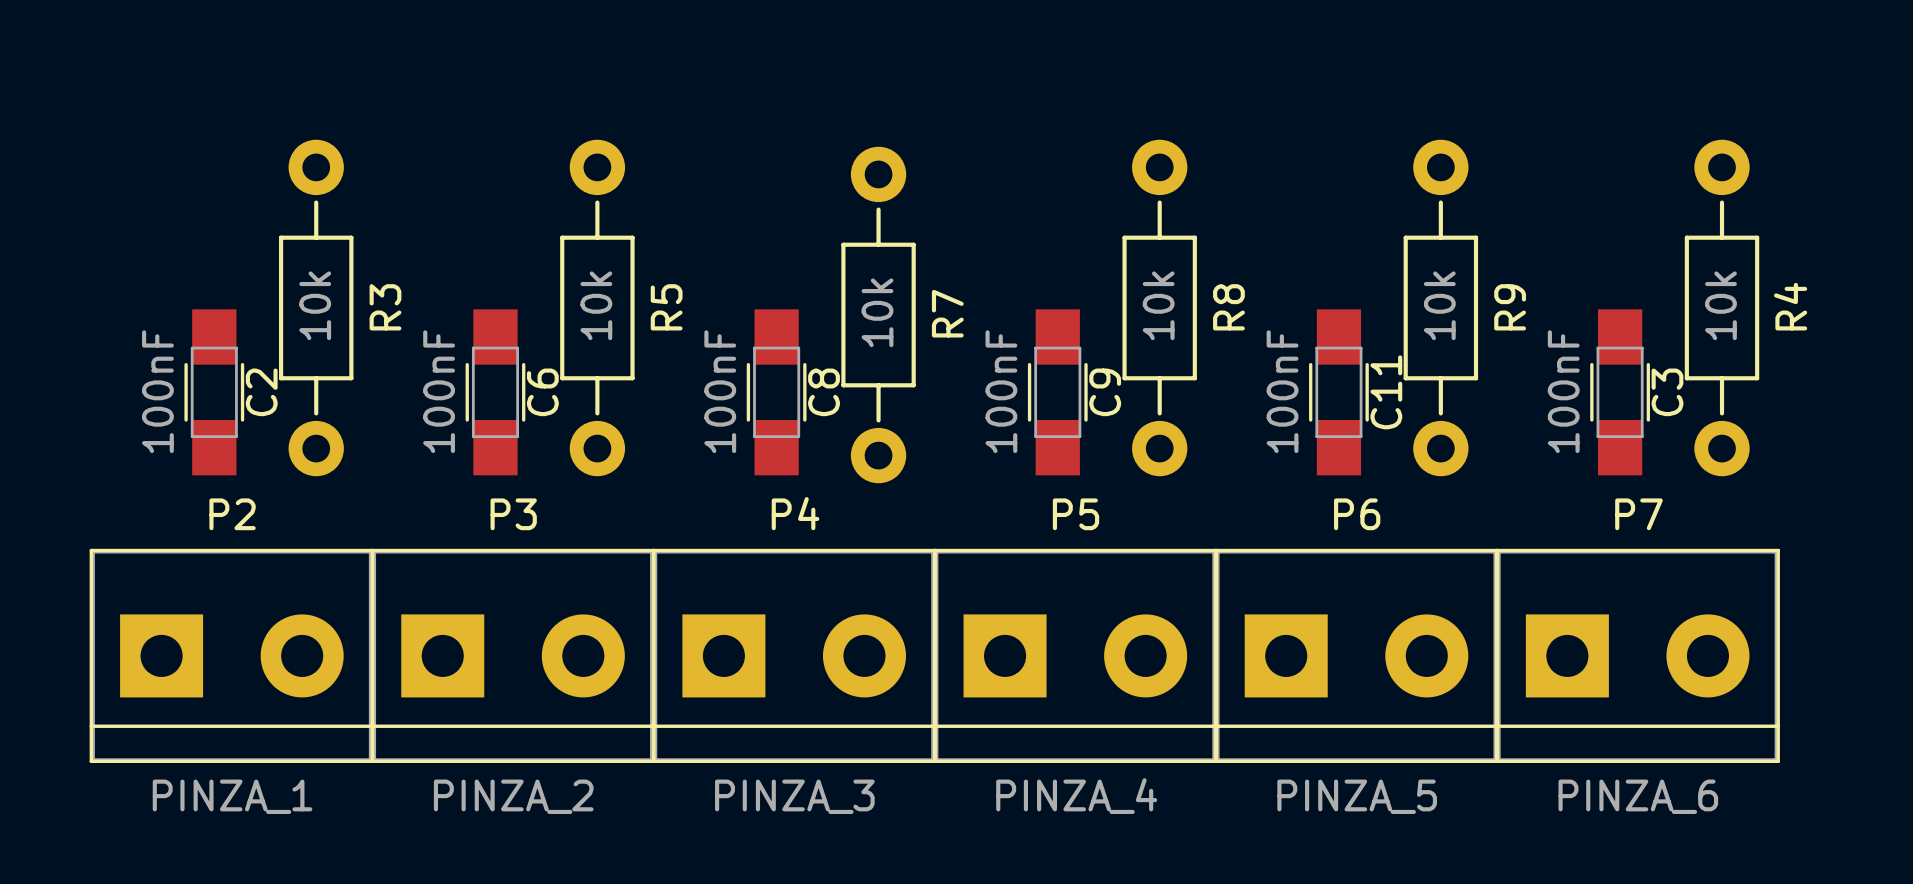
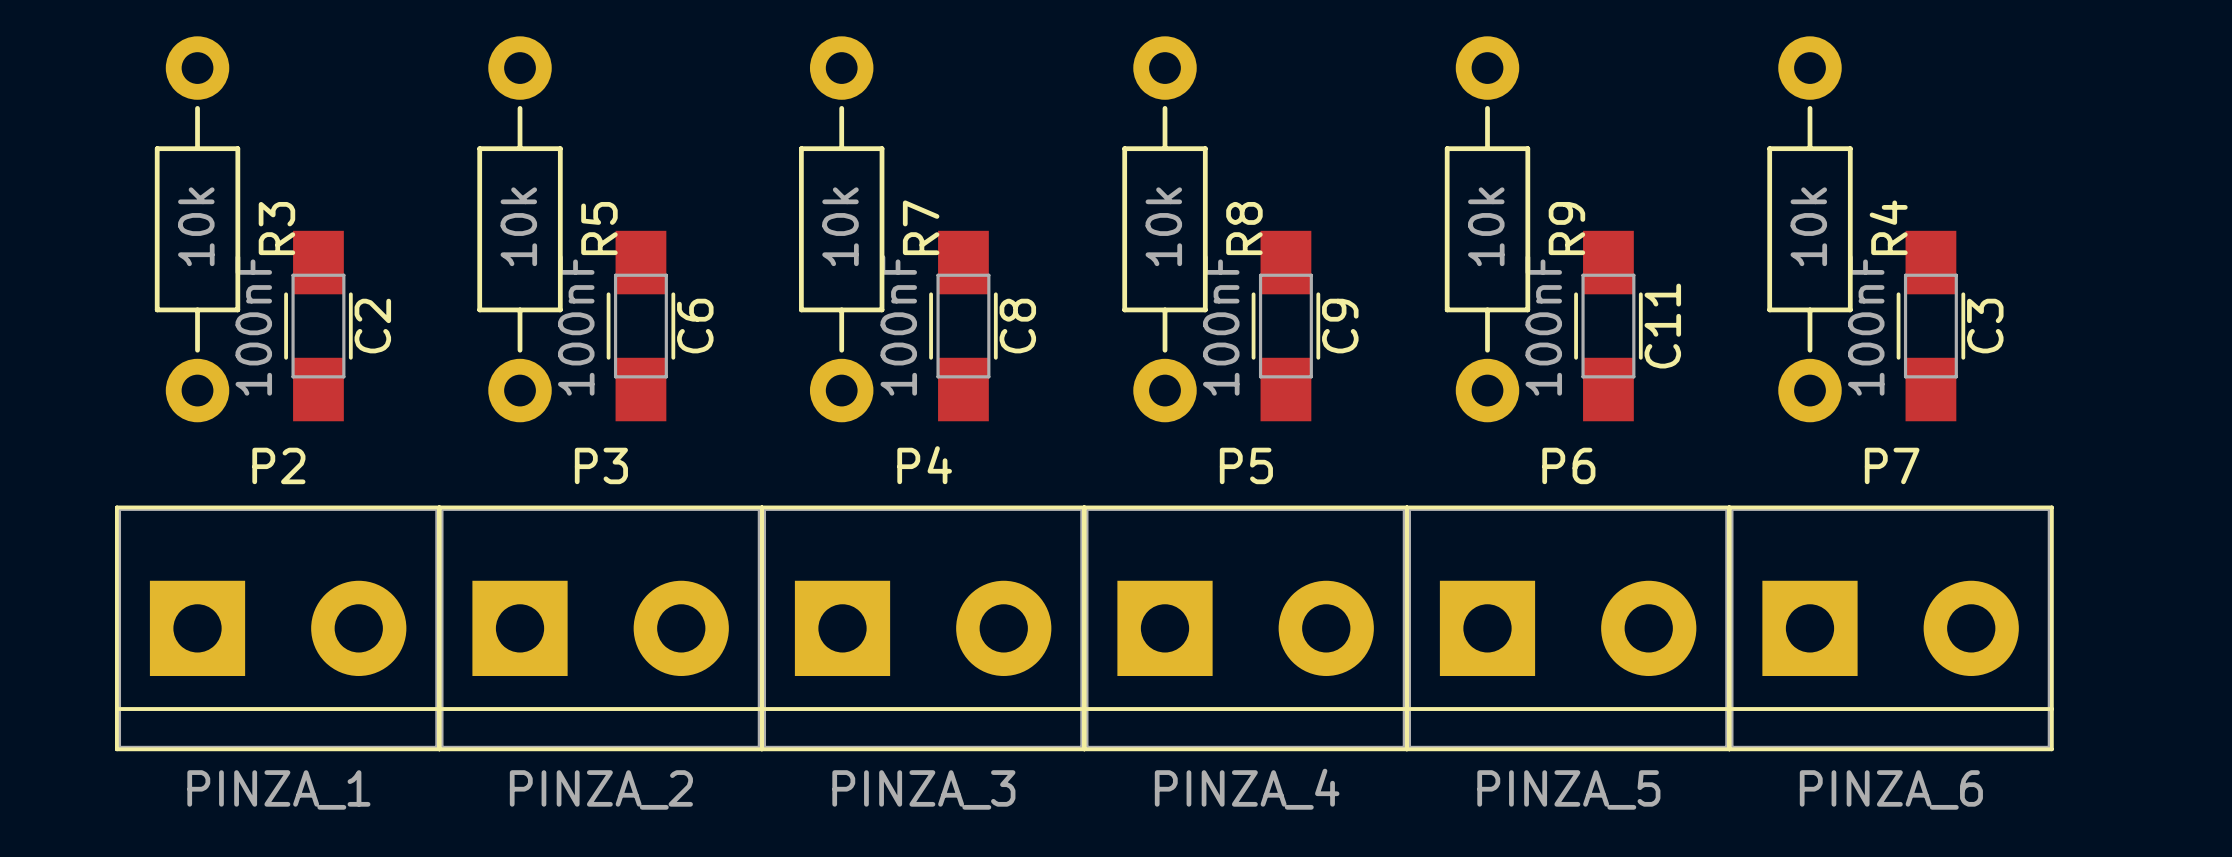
R3 position: (316, 307) -> (197, 229)
R5 position: (597, 307) -> (520, 229)
R8 position: (1159, 307) -> (1165, 229)
R9 position: (1440, 307) -> (1487, 229)
R4 position: (1722, 307) -> (1809, 229)
R7 position: (878, 315) -> (841, 229)
C2 position: (214, 392) -> (318, 326)
C6 position: (495, 392) -> (640, 326)
C8 position: (776, 392) -> (963, 326)
C9 position: (1057, 392) -> (1285, 326)
C11 position: (1338, 392) -> (1608, 326)
C3 position: (1620, 392) -> (1930, 326)

